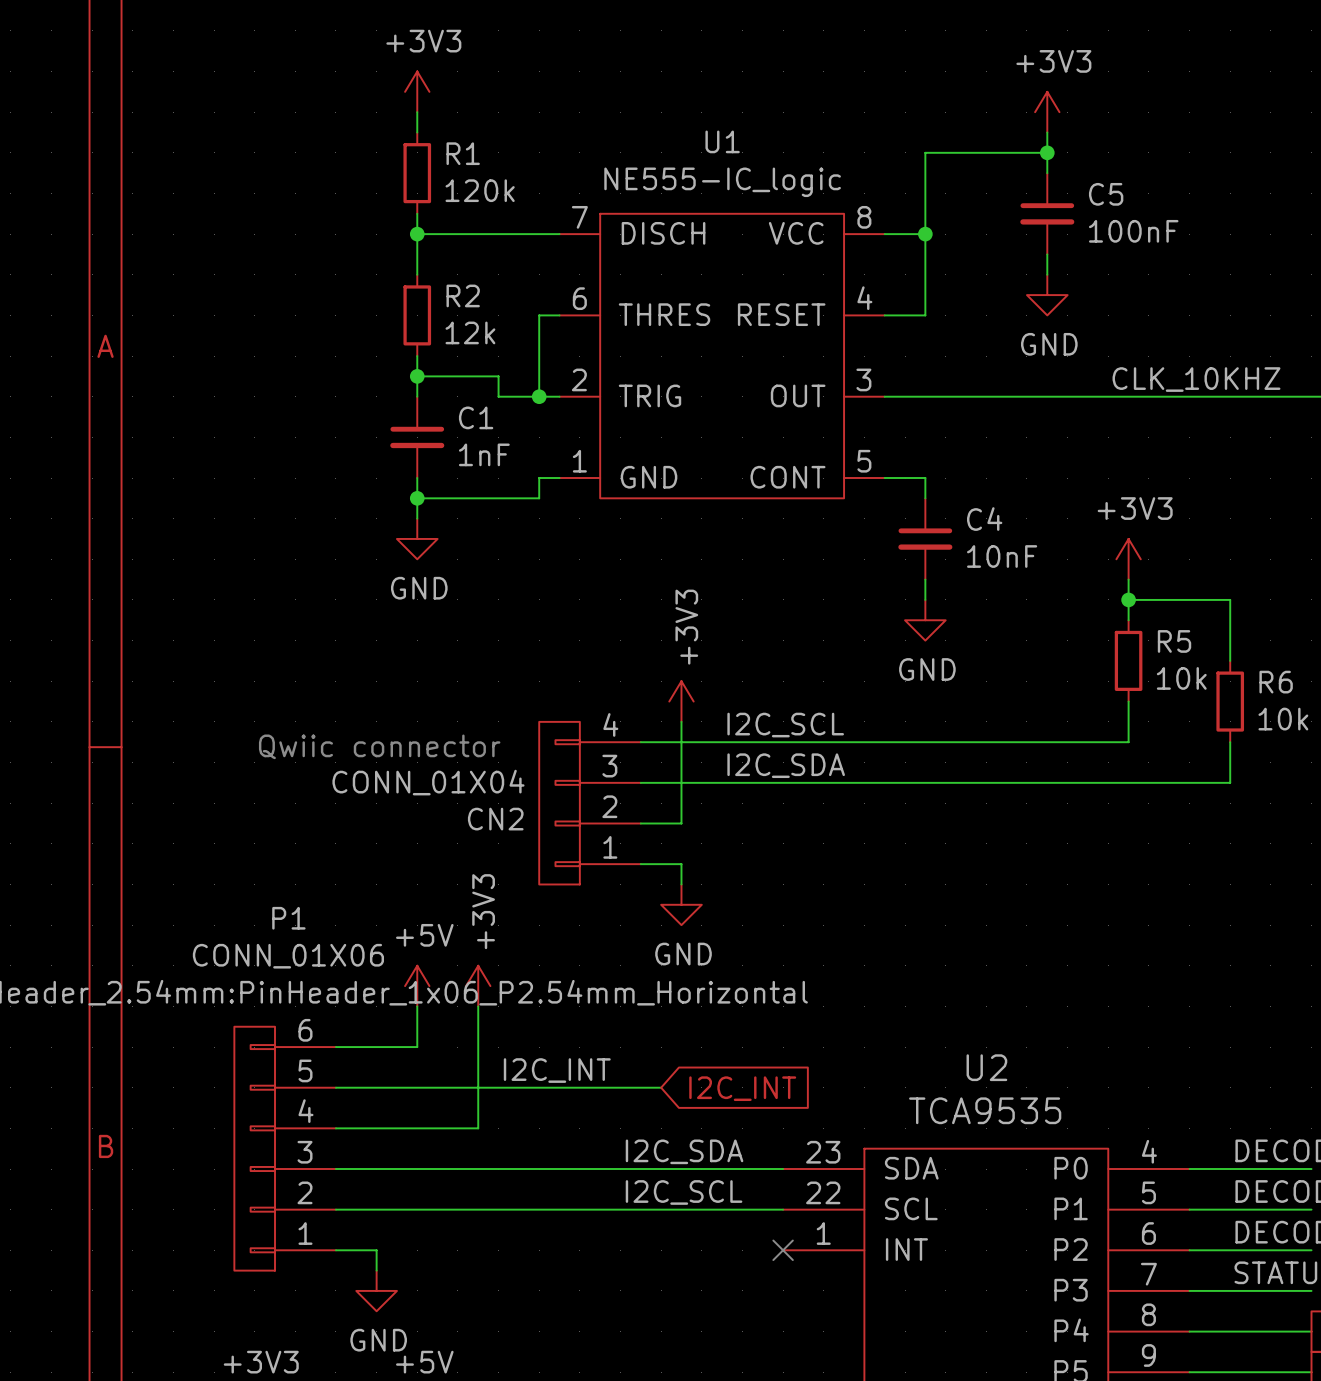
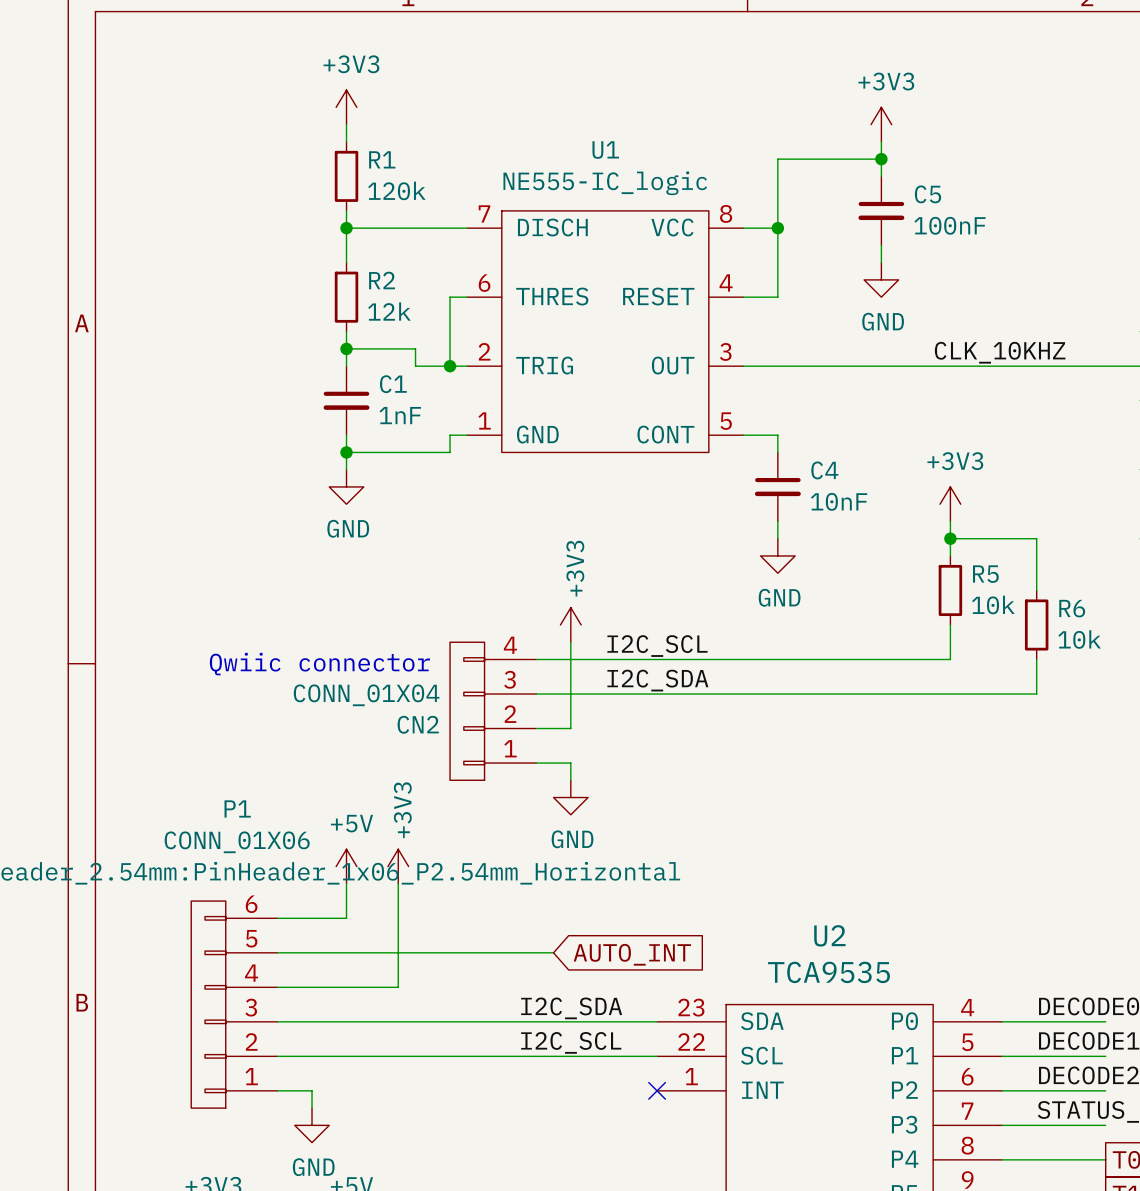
label: I2C_INT (557, 1070) -> none
global label: I2C_INT (742, 1088) -> AUTO_INT (632, 954)

